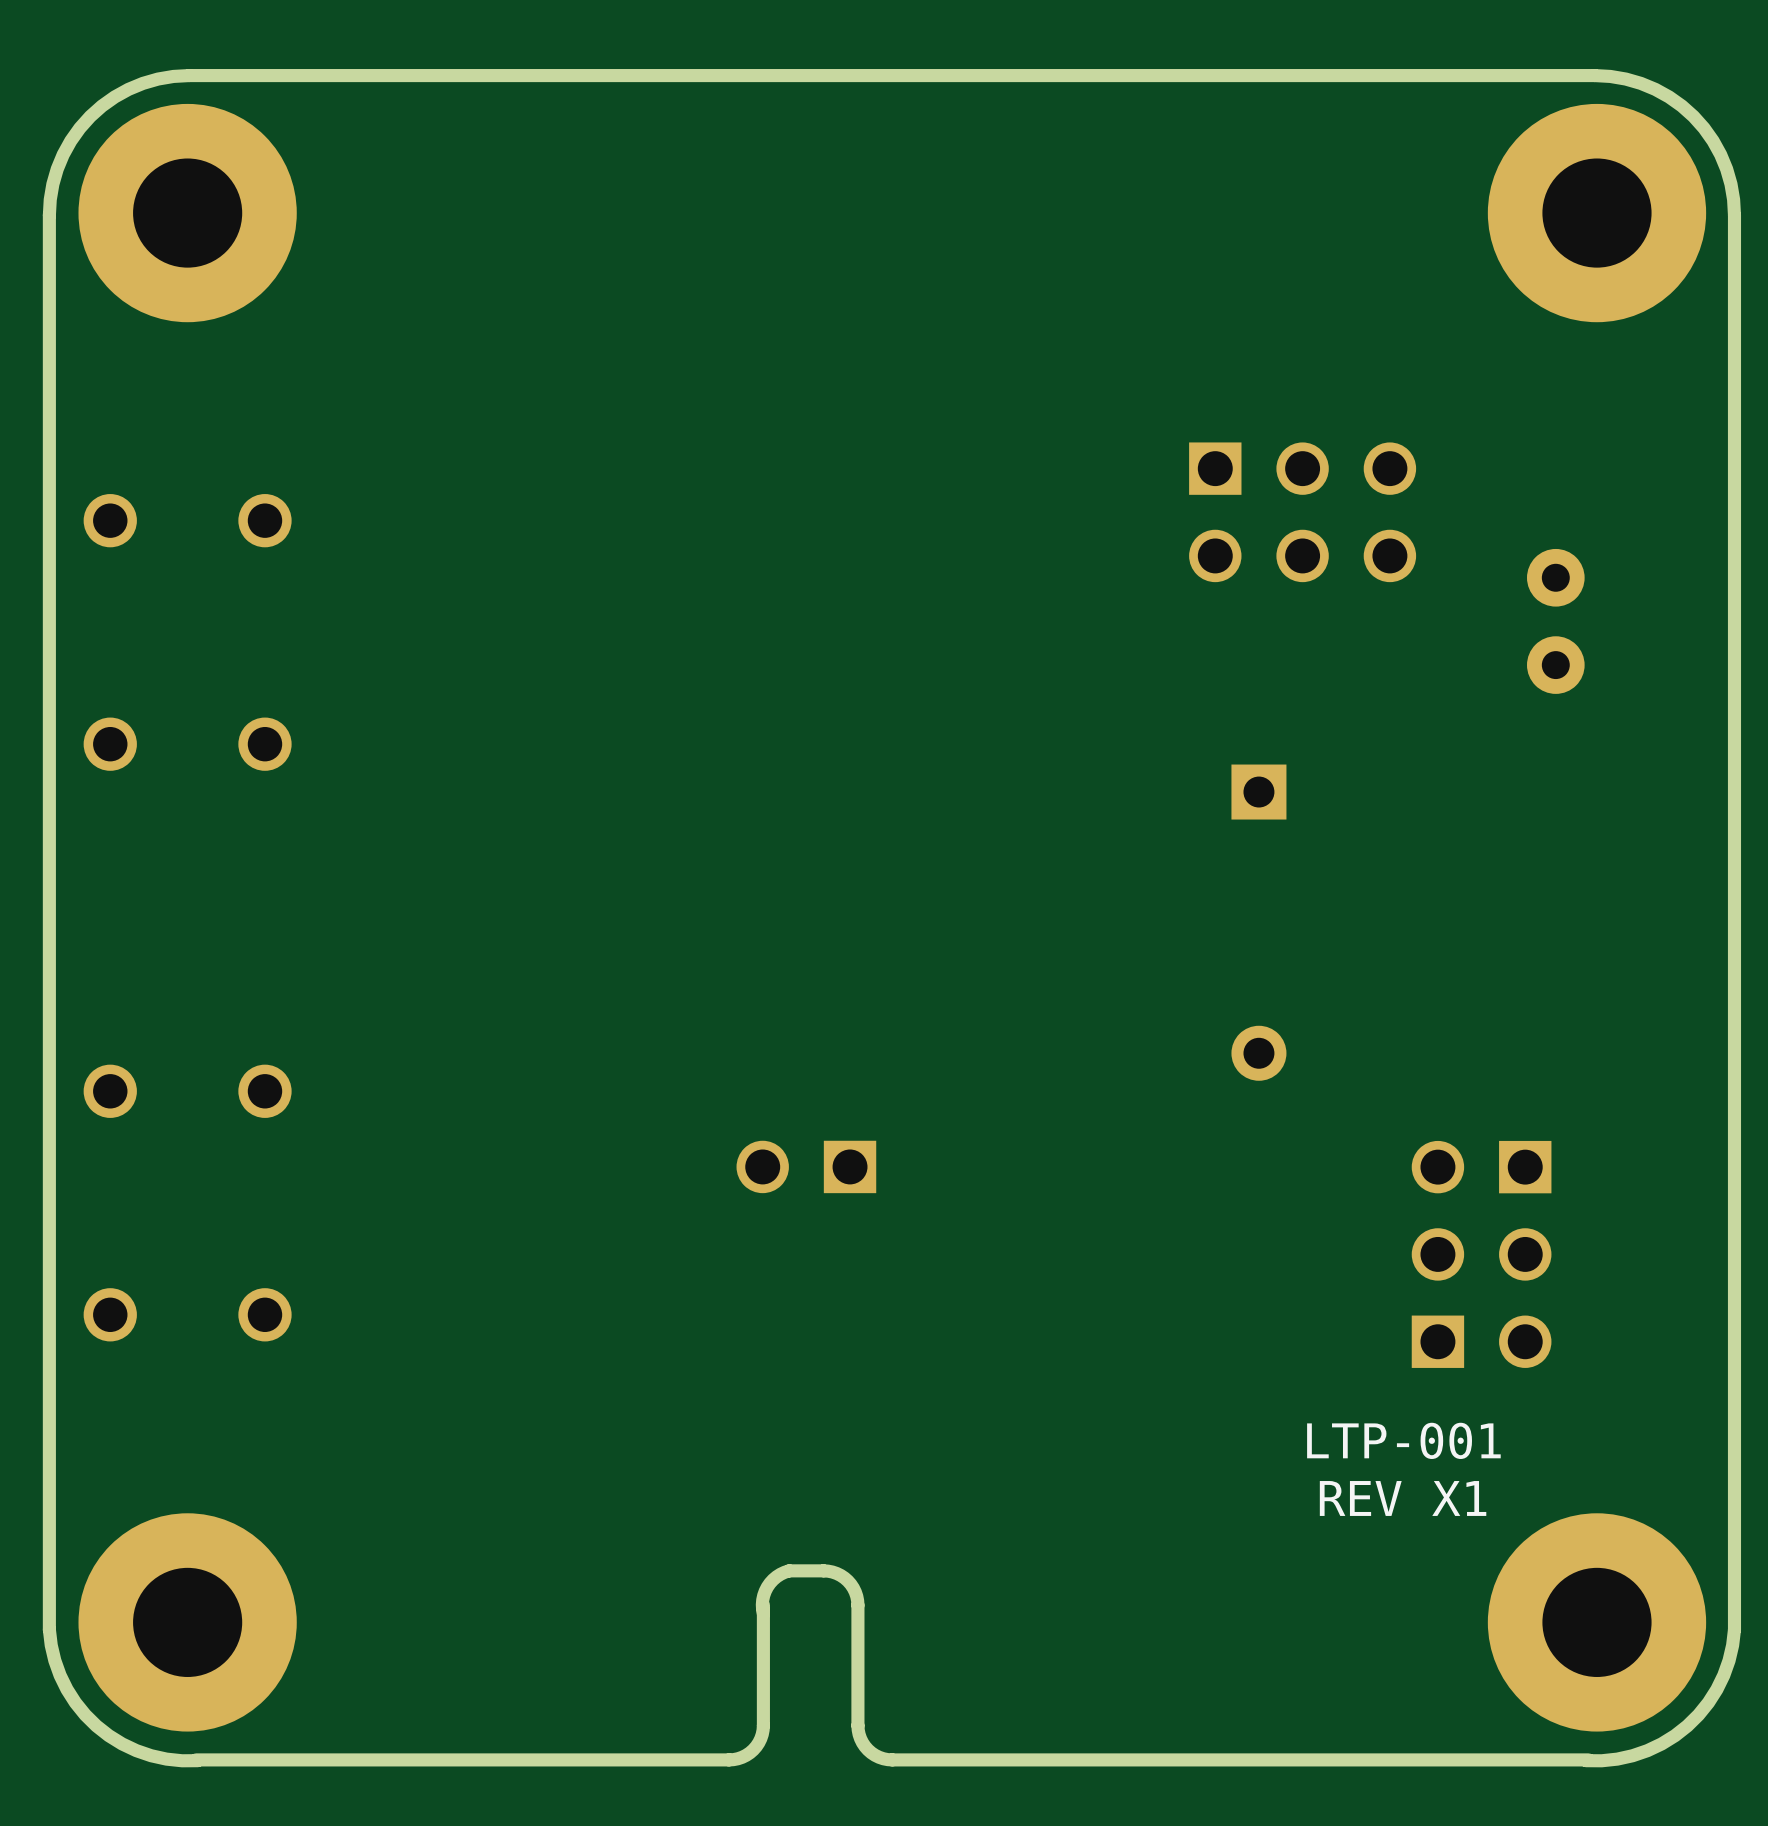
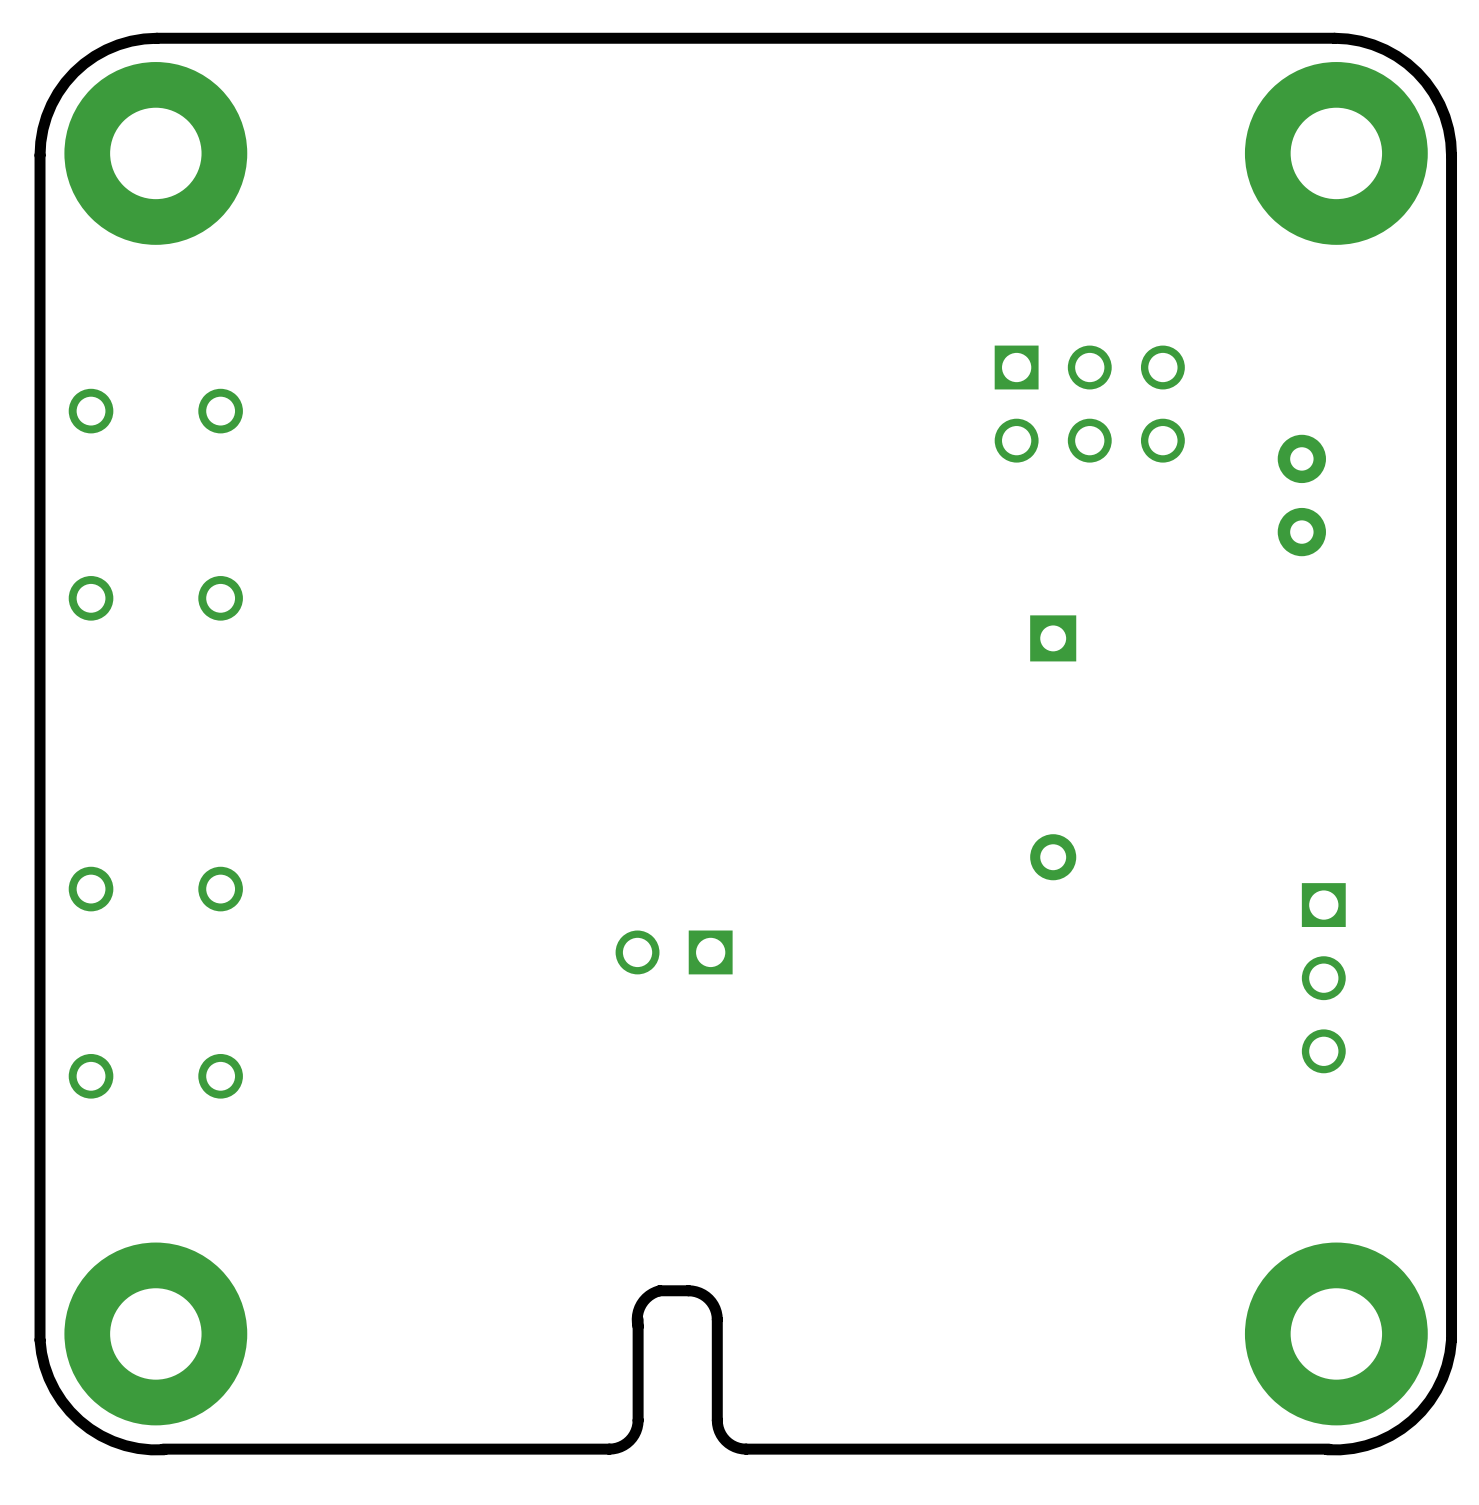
part: none -> (1323, 978)
part: (1437, 1254) -> none
part: (1525, 1254) -> none
text: LTP-001 (1403, 1440) -> none
text: REV X1 (1403, 1498) -> none

